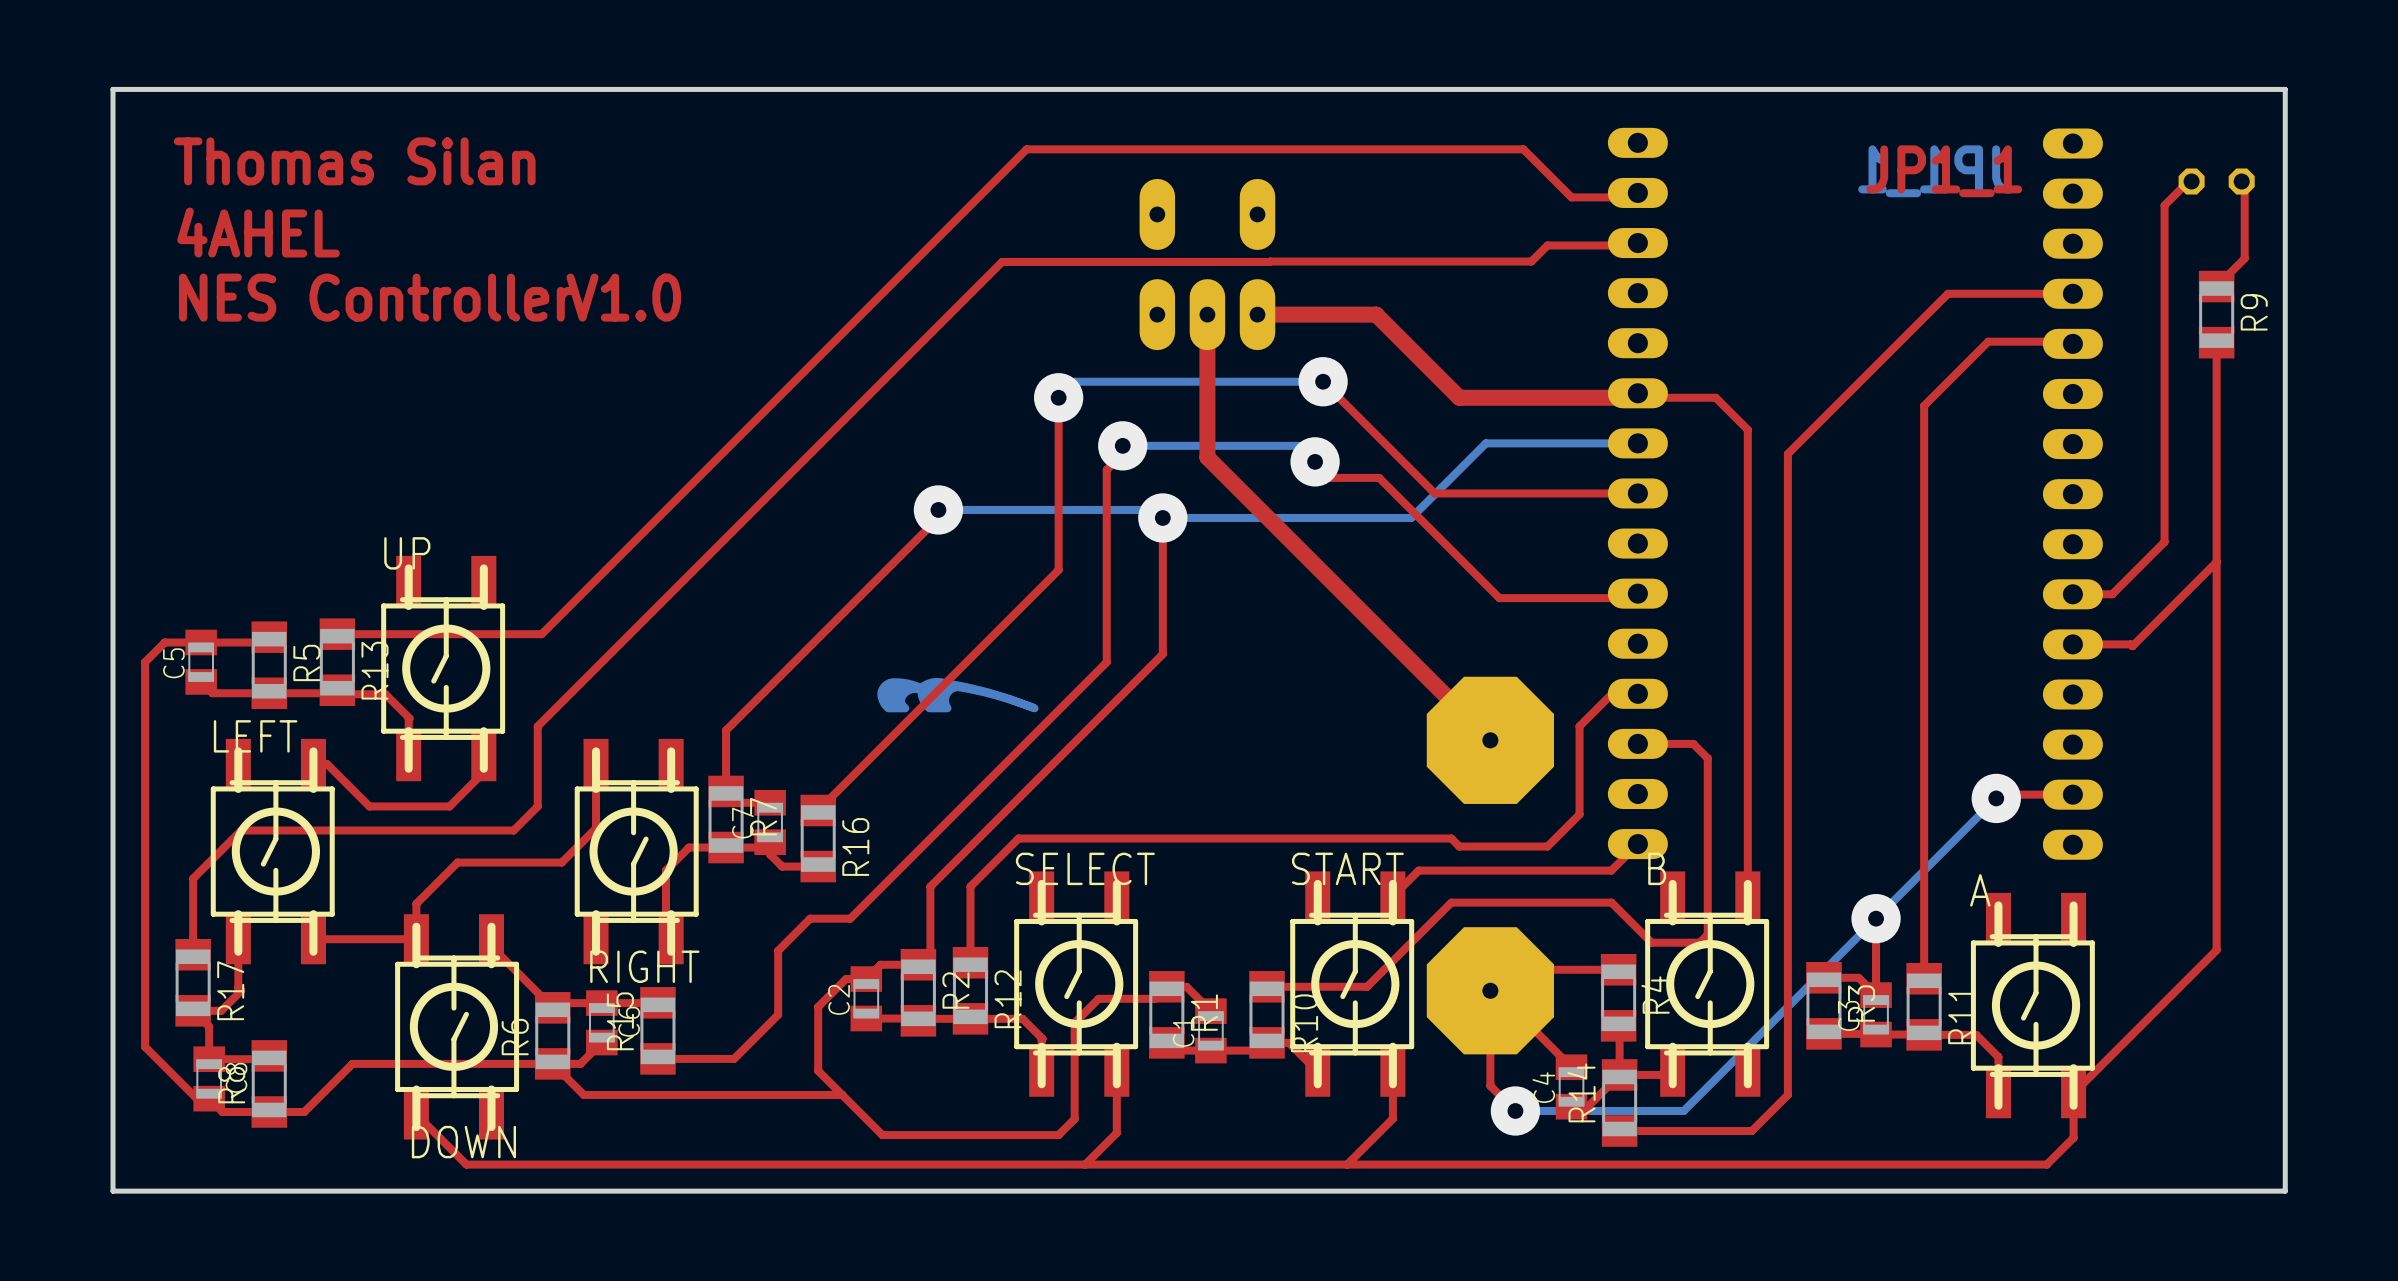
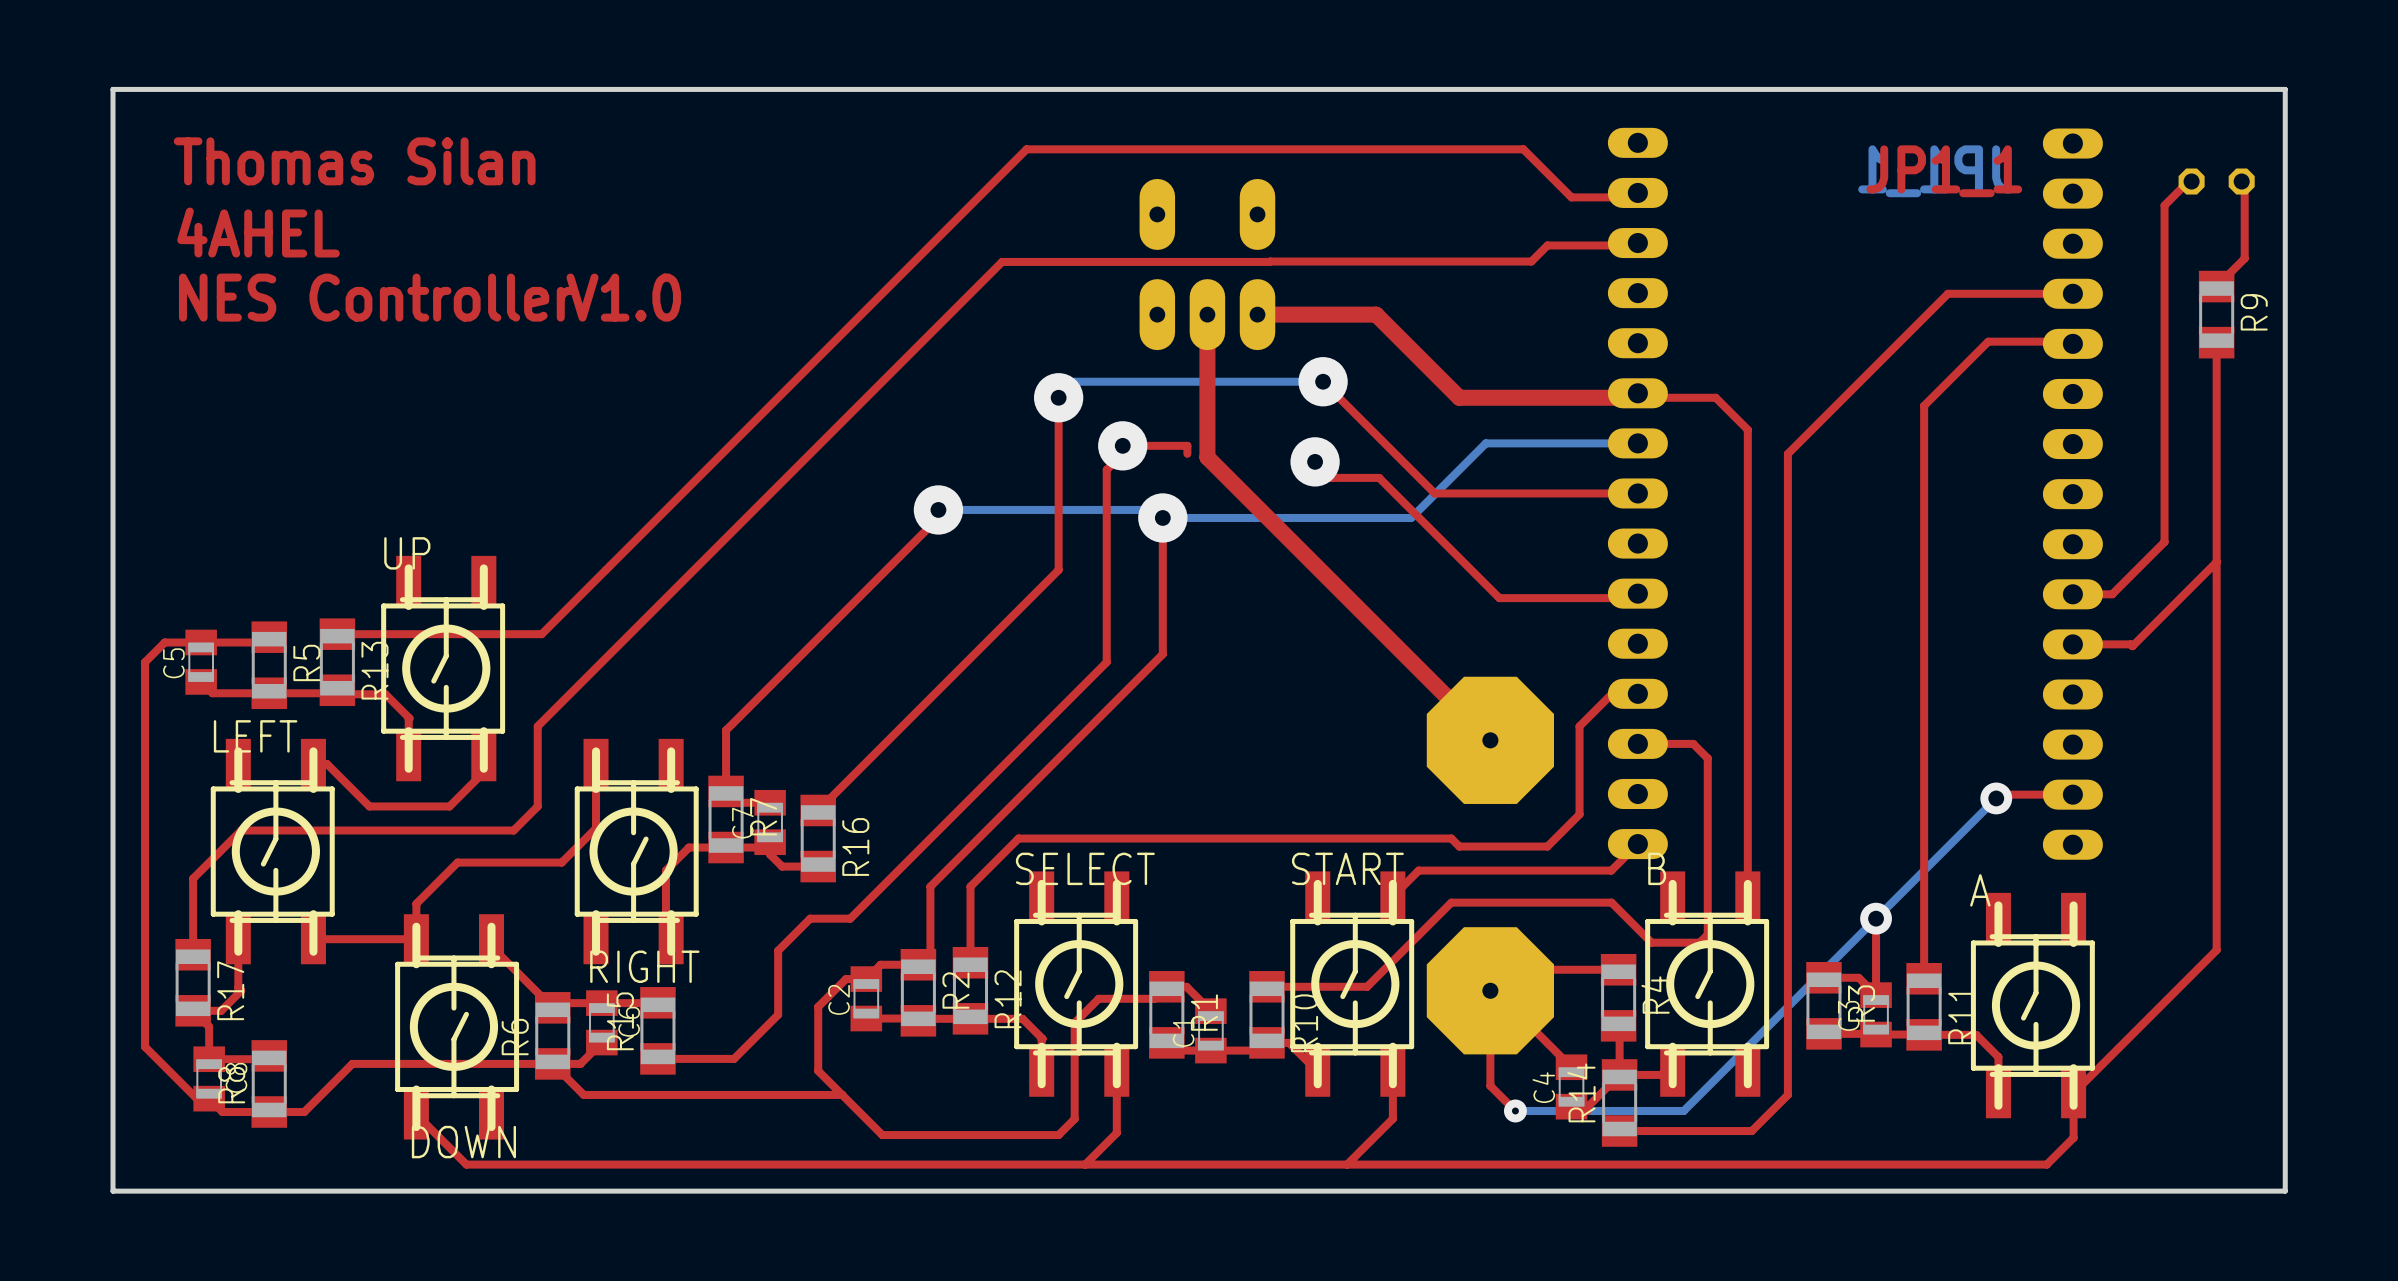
top track: none -> (1122, 445) (1187, 445) (1187, 453)
bottom track: (1122, 445) (1299, 445) (1315, 461) -> none
drawing: [877, 677, 1039, 713] -> none
via size: [1971, 773, 2021, 824] -> [1980, 782, 2013, 815]
via size: [1851, 894, 1901, 944] -> [1860, 902, 1892, 935]
via size: [1490, 1086, 1541, 1136] -> [1503, 1099, 1527, 1123]

